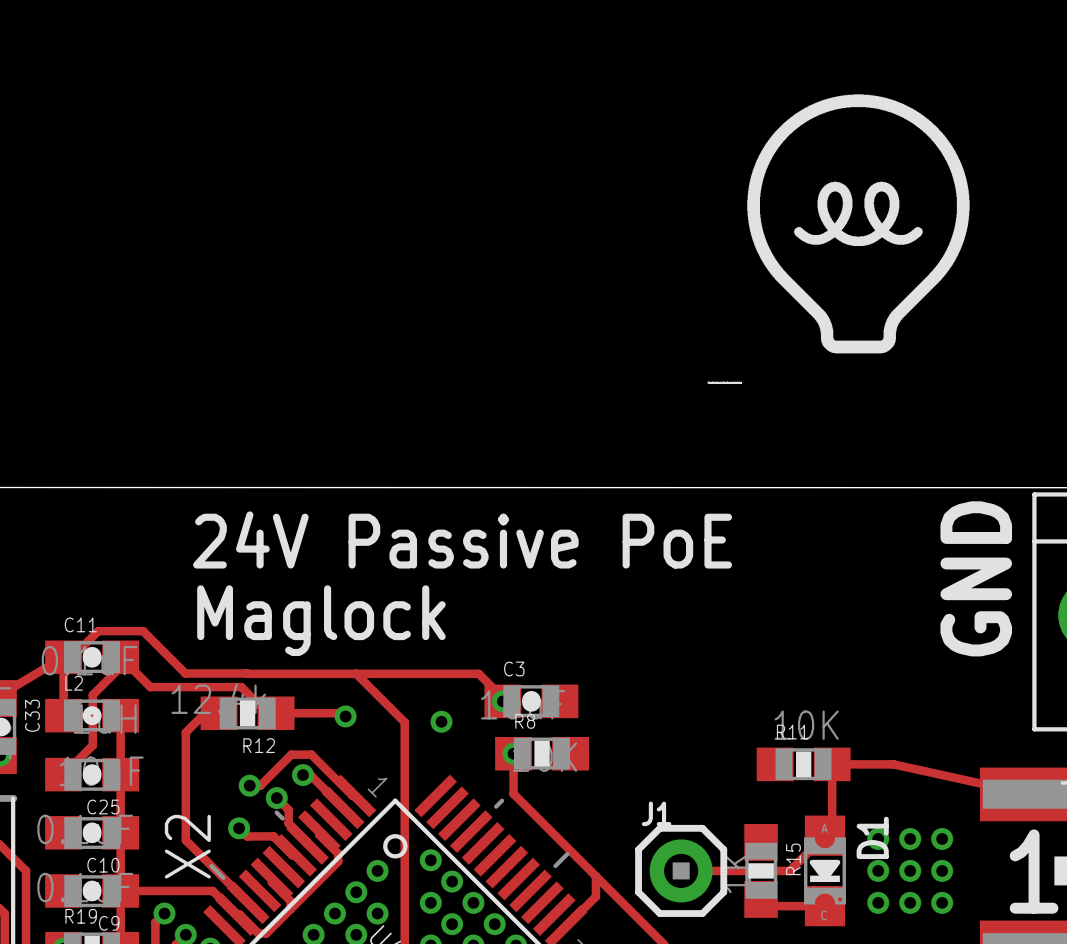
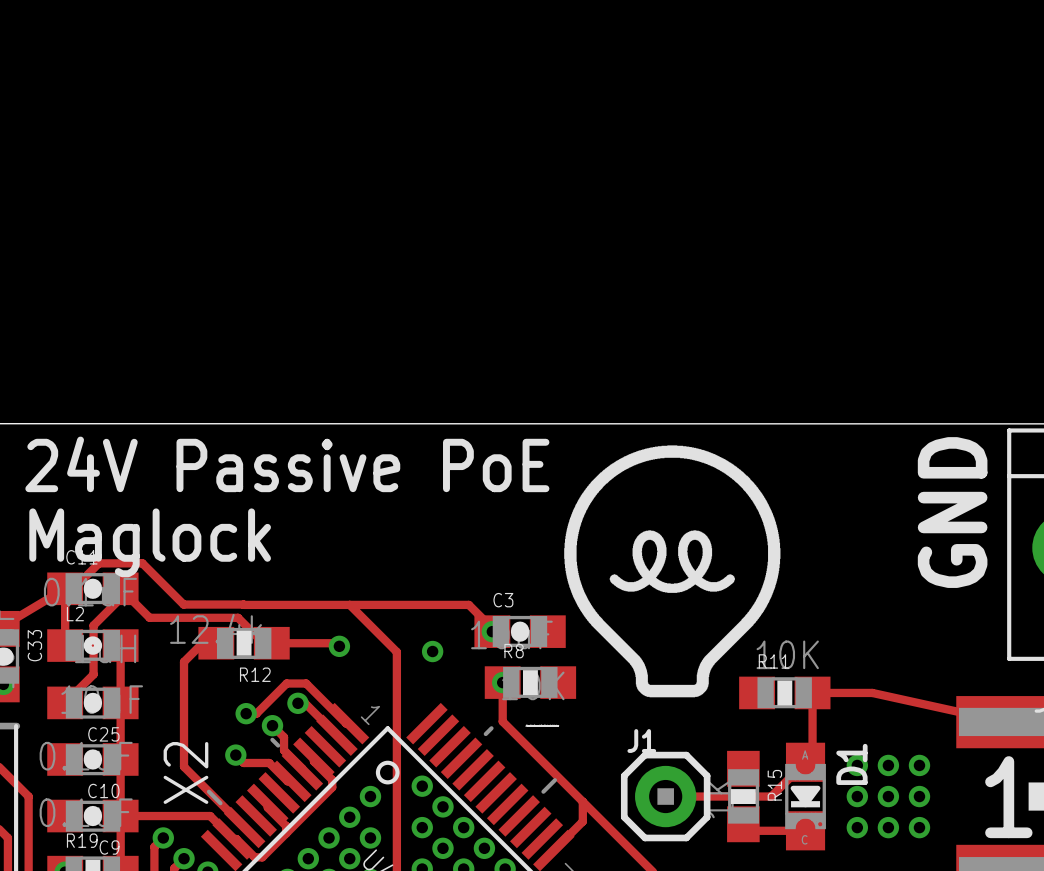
drawing position: (858, 223) -> (672, 571)
text position: 24V Passive PoE (462, 539) -> 24V Passive PoE (287, 464)
text position: Maglock (321, 620) -> Maglock (150, 542)

